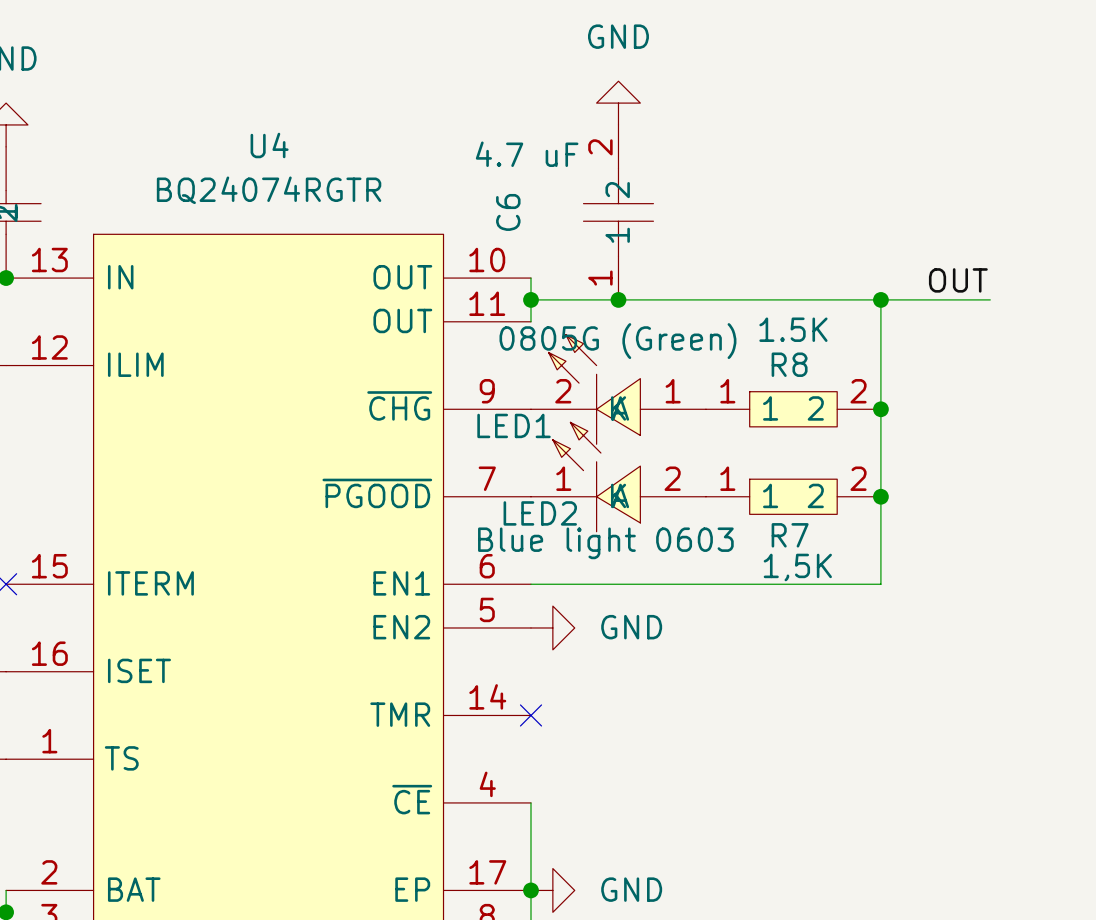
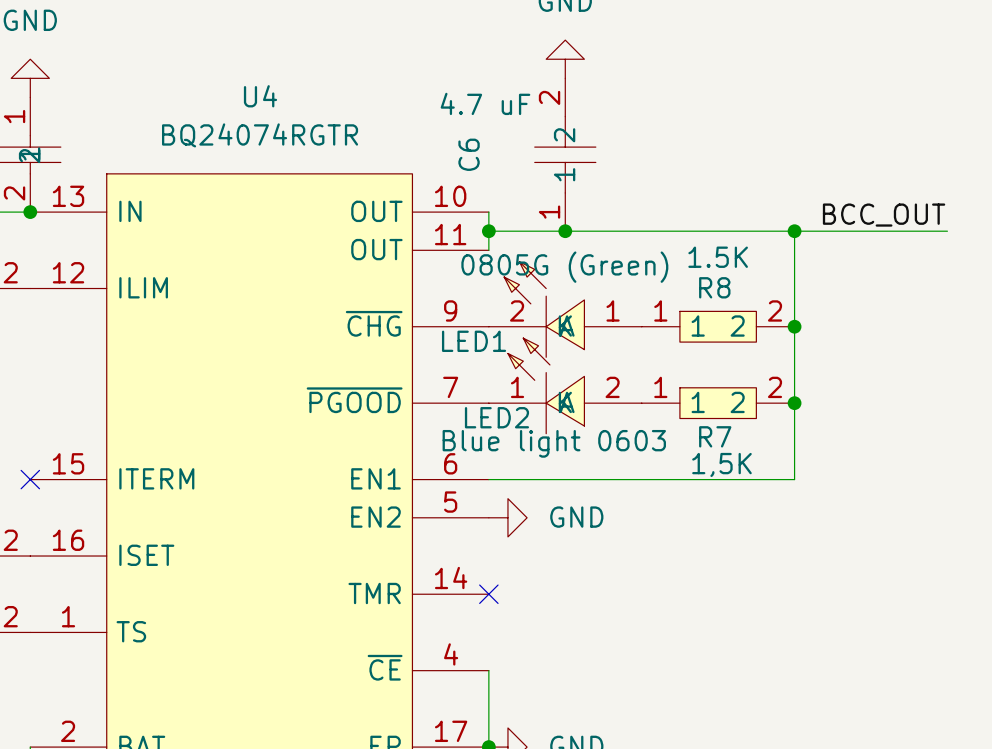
label: OUT (958, 280) -> none
label: none -> BCC_OUT (884, 215)
wire: none -> (890, 231) (947, 231)

